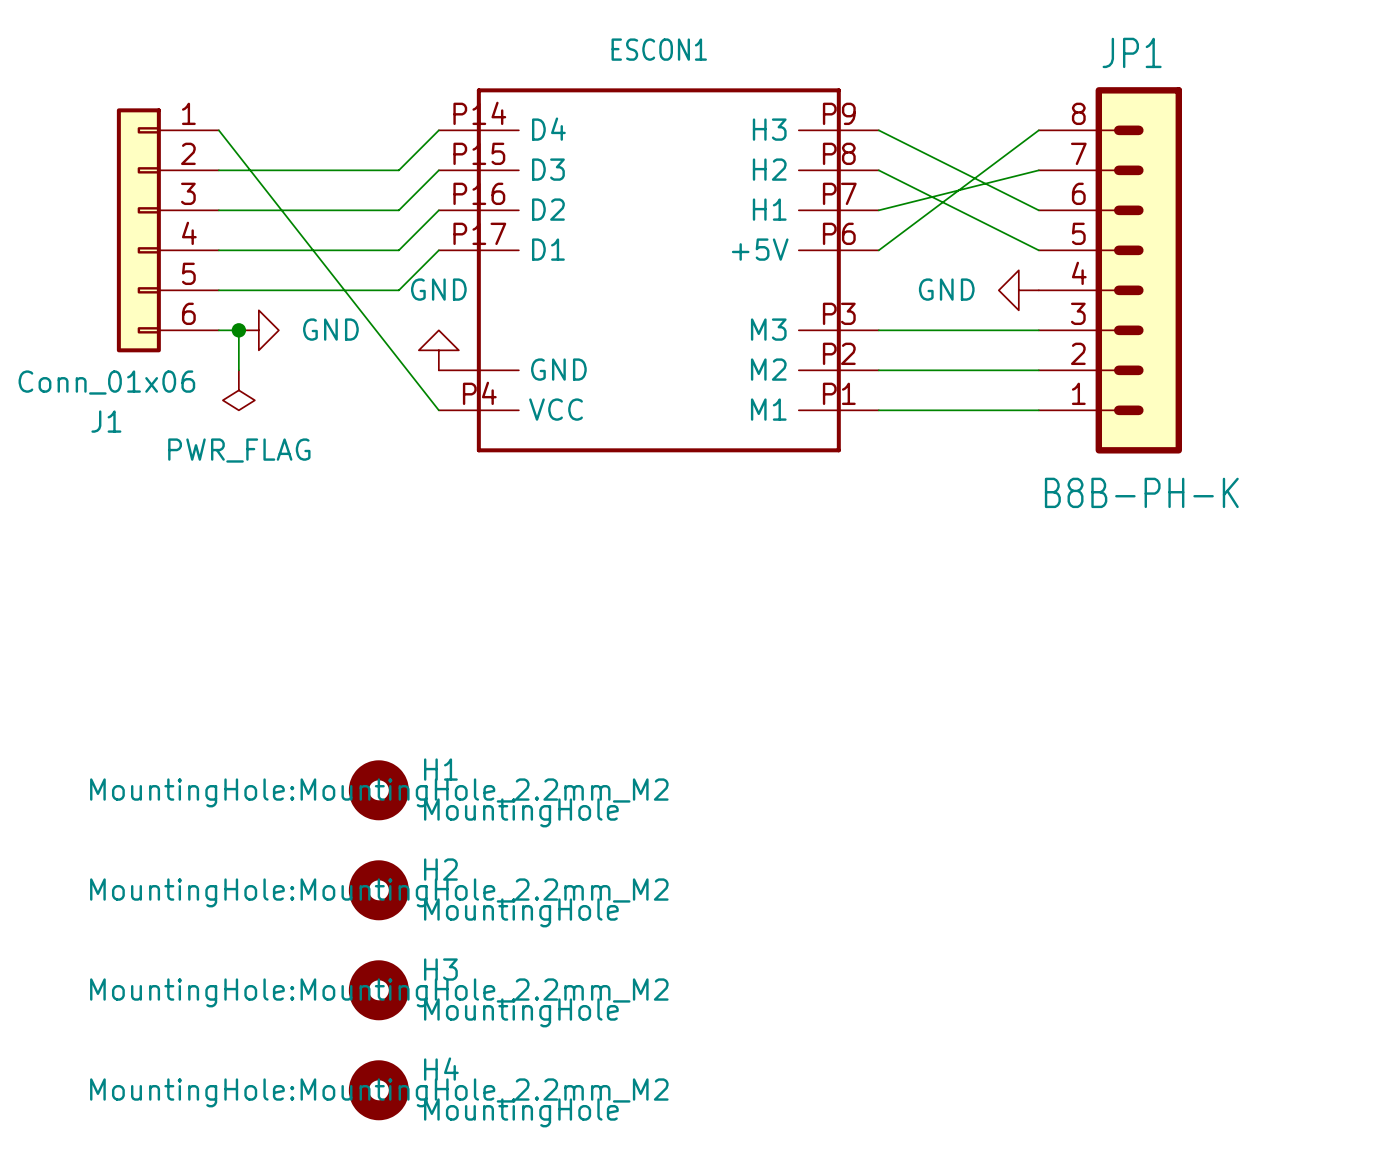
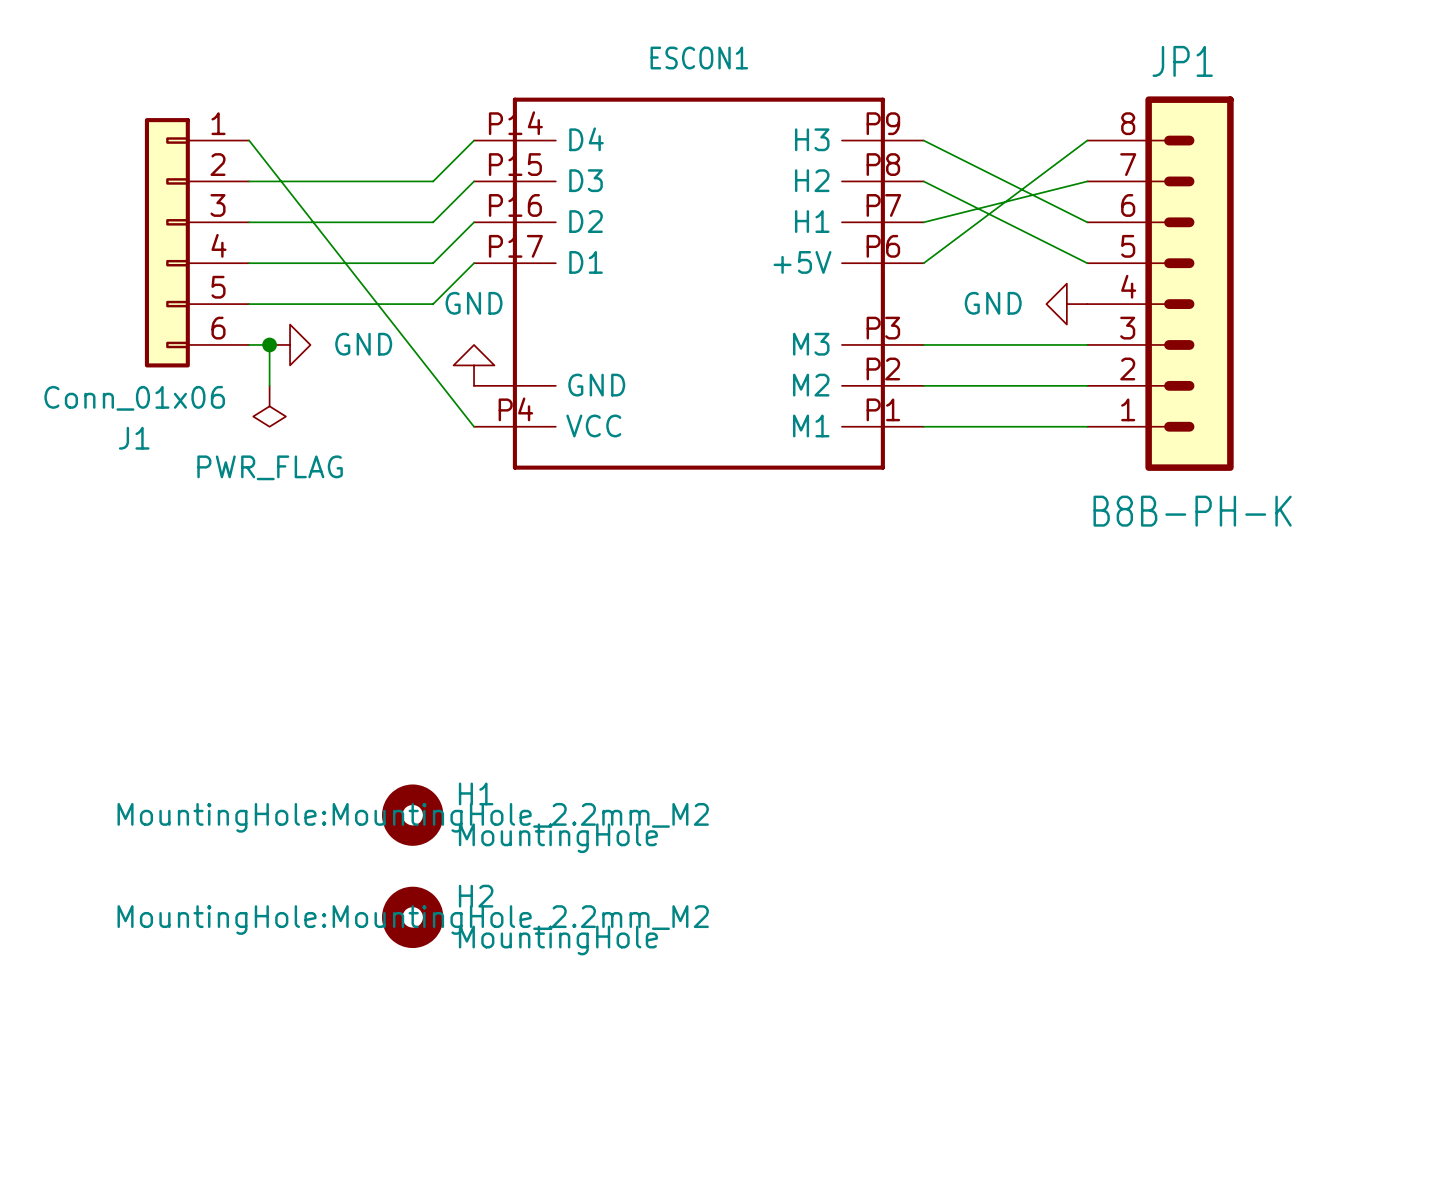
H3: MountingHole (378, 990) -> none
H4: MountingHole (378, 1090) -> none

